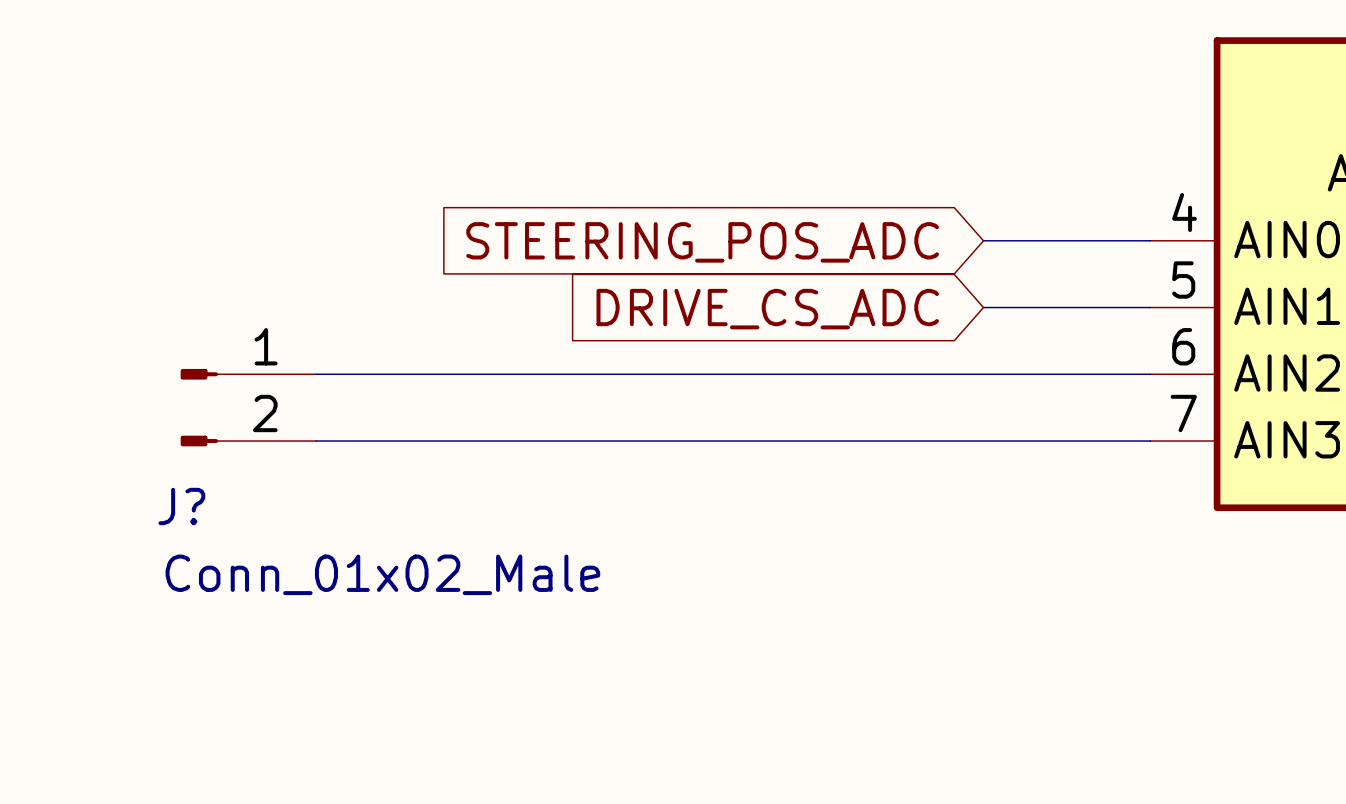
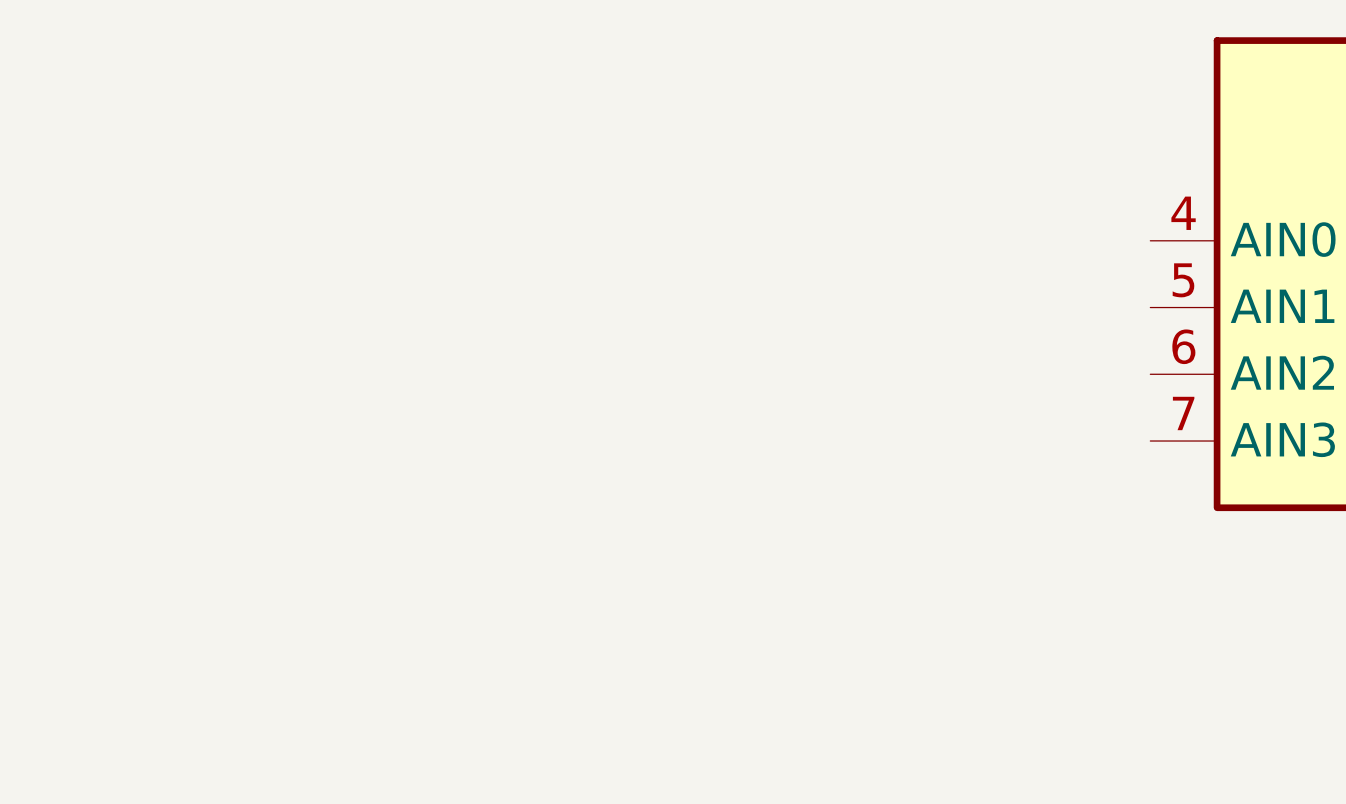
wire: (983, 240) (1150, 240) -> none
global label: STEERING_POS_ADC (702, 242) -> none
wire: (983, 307) (1150, 307) -> none
global label: DRIVE_CS_ADC (767, 309) -> none
wire: (316, 374) (1150, 374) -> none
J?: Conn_01x02_Male (248, 407) -> none
wire: (316, 441) (1150, 441) -> none

